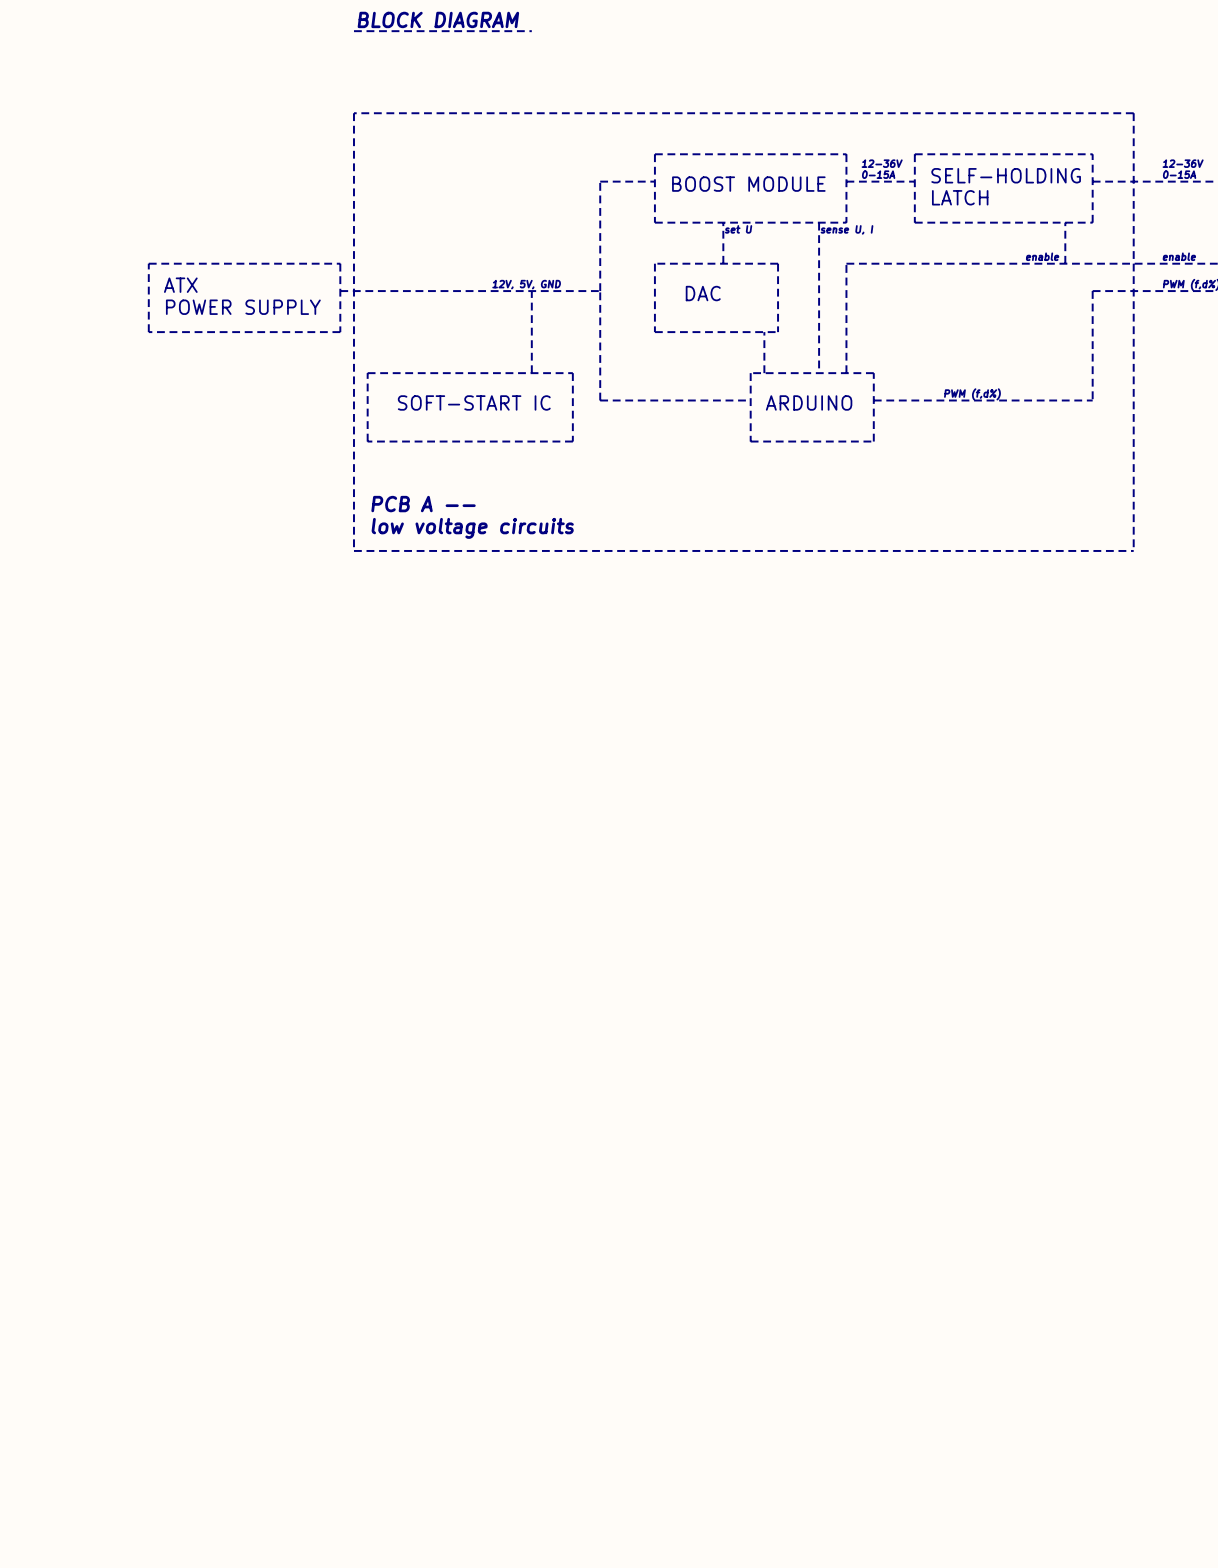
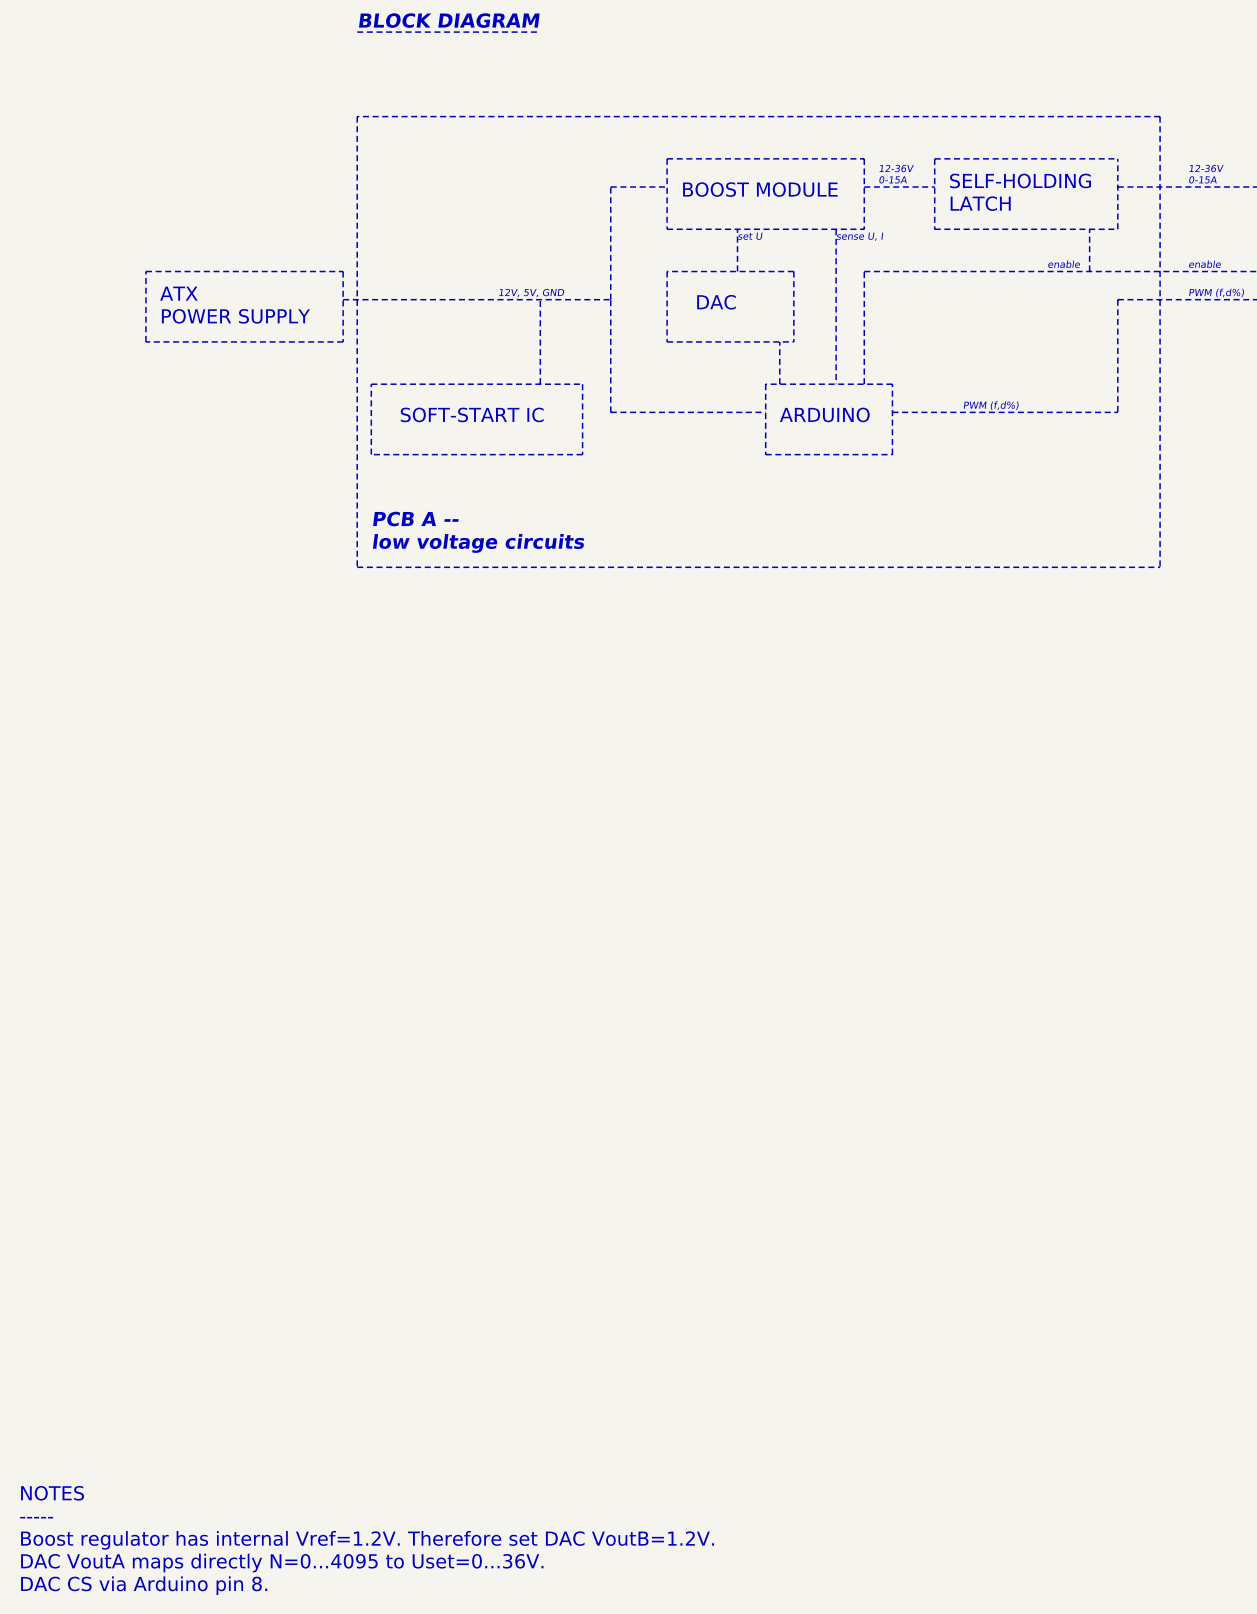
text: none -> NOTES (52, 1493)
text: none -> ----- (36, 1517)
text: none -> Boost regulator has internal Vref=1.2V. Therefore set DAC VoutB=1.2V. (367, 1540)
text: none -> DAC VoutA maps directly N=0...4095 to Uset=0...36V. (282, 1562)
text: none -> DAC CS via Arduino pin 8. (144, 1585)

